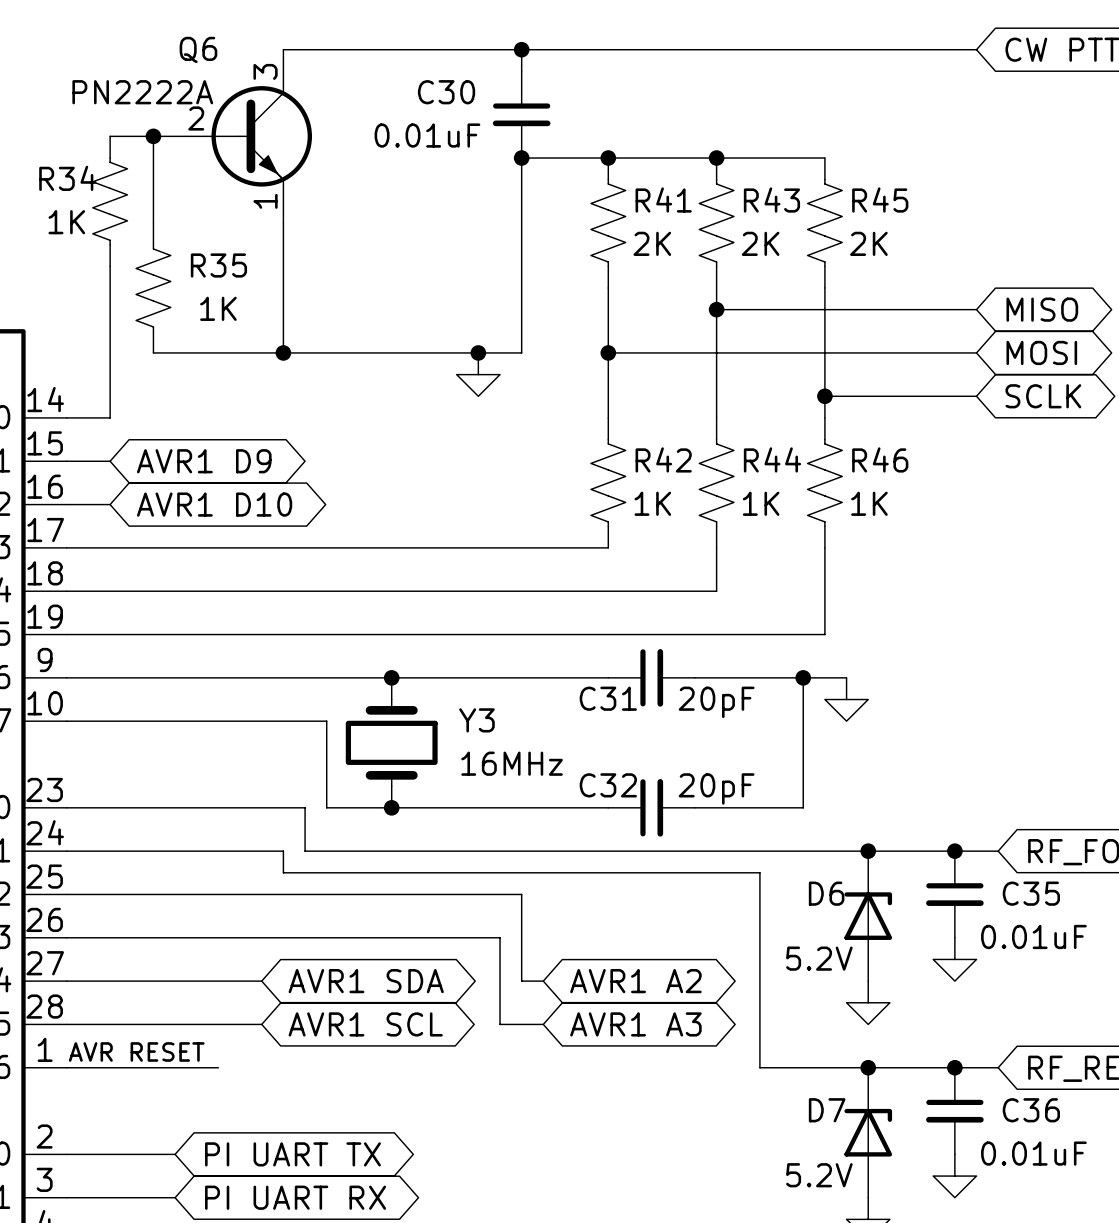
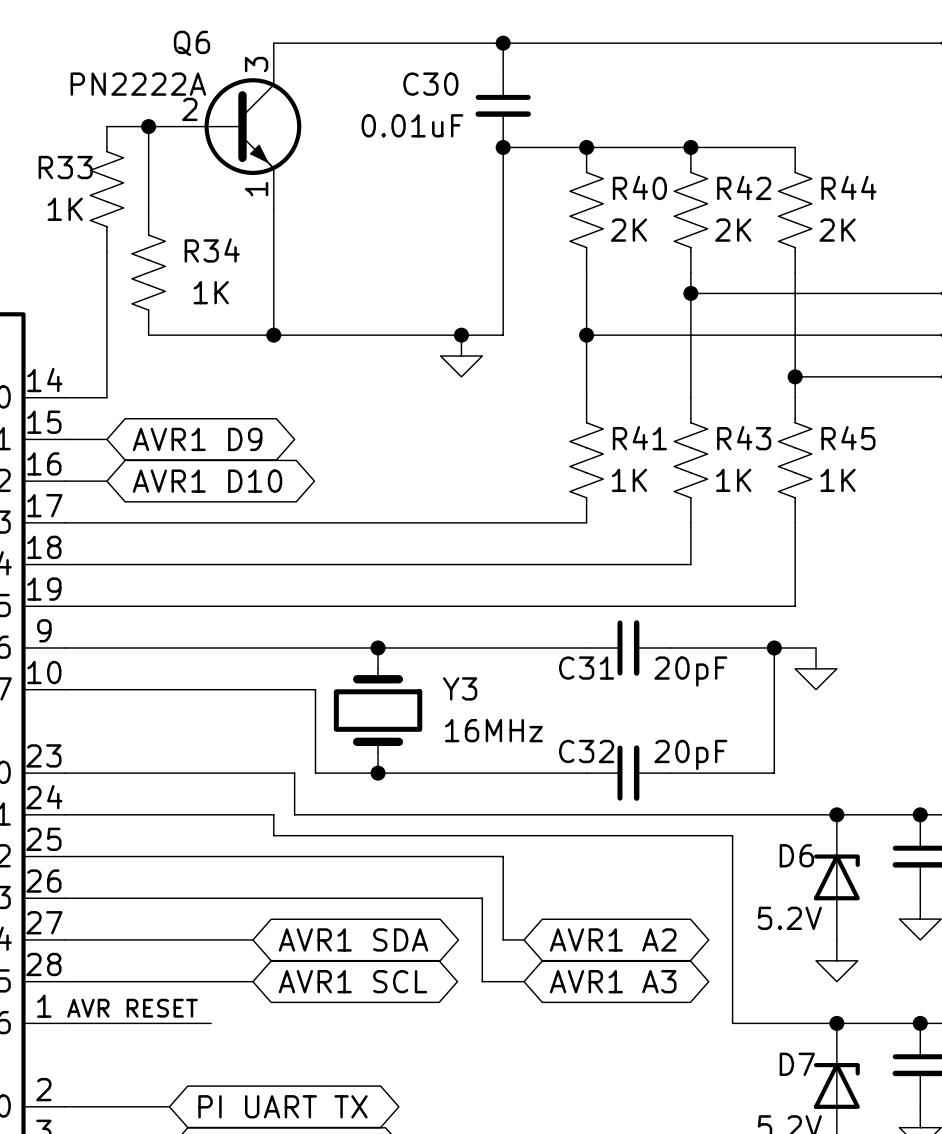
R34 name: R34 (67, 178) -> R33 (65, 167)
R41 name: R41 (663, 200) -> R40 (639, 187)
R43 name: R43 (771, 200) -> R42 (744, 187)
R45 name: R45 (880, 200) -> R44 (848, 187)
R35 name: R35 (218, 265) -> R34 (212, 250)
R42 name: R42 (663, 459) -> R41 (639, 438)
R44 name: R44 (772, 459) -> R43 (744, 438)
R46 name: R46 (880, 459) -> R45 (848, 438)

